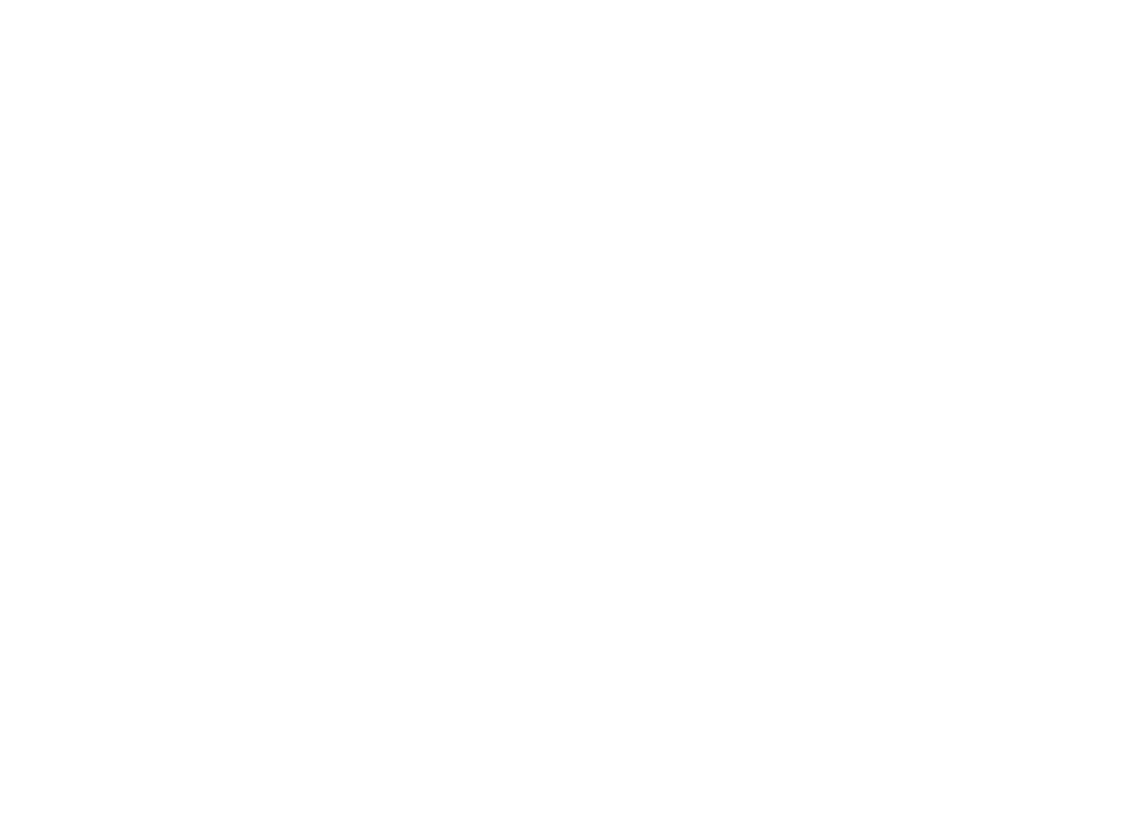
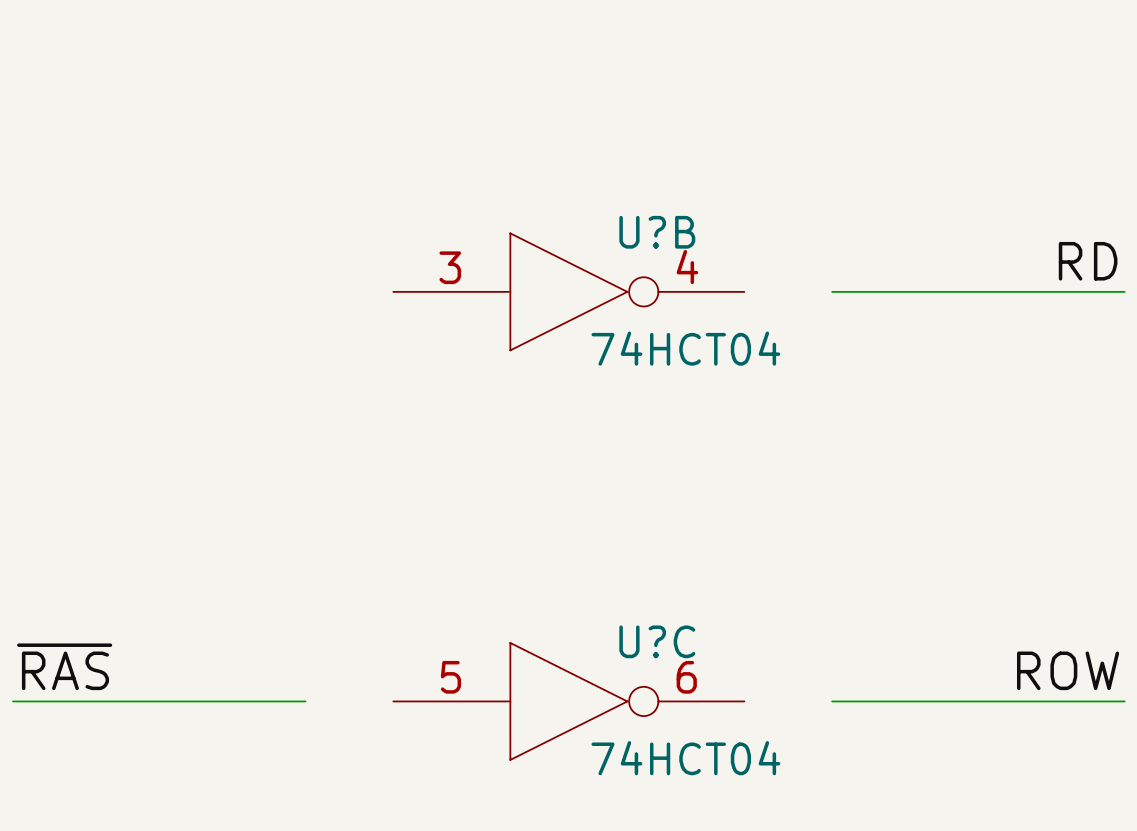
label: none -> RD (1088, 261)
U?B: none -> 74HCT04 (568, 291)
wire: none -> (832, 291) (1124, 291)
label: none -> ~{RAS} (64, 666)
label: none -> ROW (1068, 670)
wire: none -> (13, 701) (305, 701)
U?C: none -> 74HCT04 (568, 701)
wire: none -> (832, 701) (1124, 701)

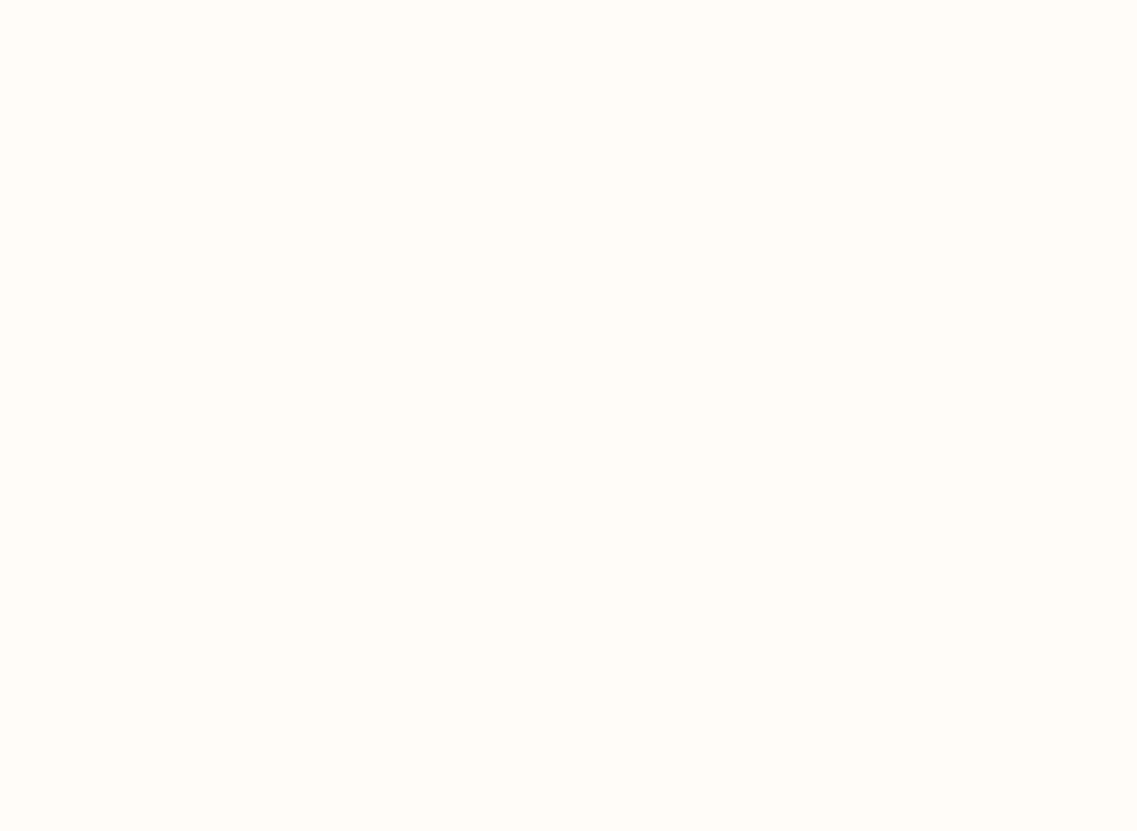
label: RD (1088, 261) -> none
U?B: 74HCT04 (568, 291) -> none
wire: (832, 291) (1124, 291) -> none
label: ~{RAS} (64, 666) -> none
label: ROW (1068, 670) -> none
wire: (13, 701) (305, 701) -> none
U?C: 74HCT04 (568, 701) -> none
wire: (832, 701) (1124, 701) -> none

